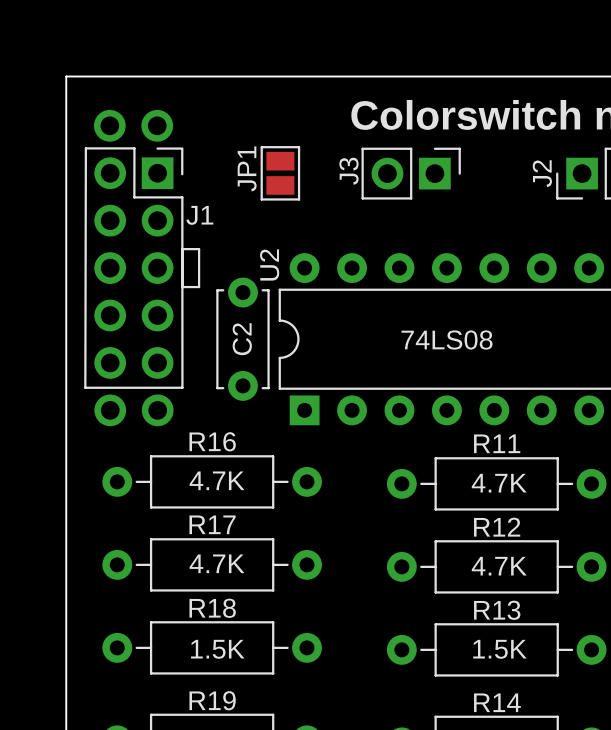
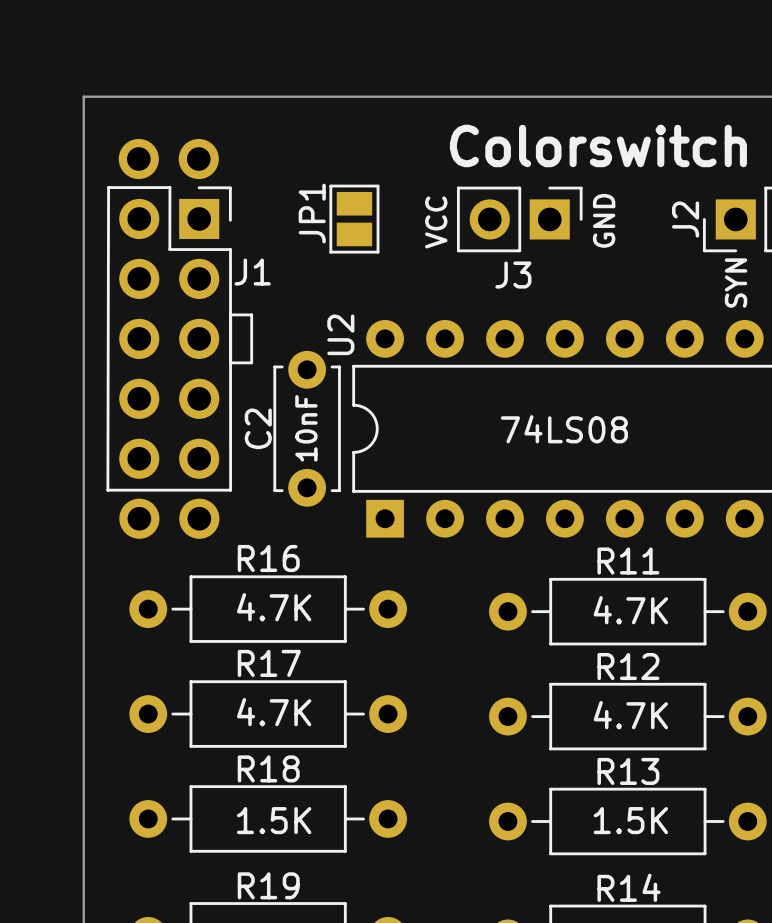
J3 name rotation: 0° (348, 171) -> 90° clockwise (513, 275)
J3 name position: J3 (348, 171) -> J3 (513, 275)
text: none -> VCC (436, 222)
text: none -> GND (604, 220)
text: none -> SYN (736, 283)
C2 value: none -> 10nF (306, 428)
C2 name position: C2 (242, 339) -> C2 (258, 428)

